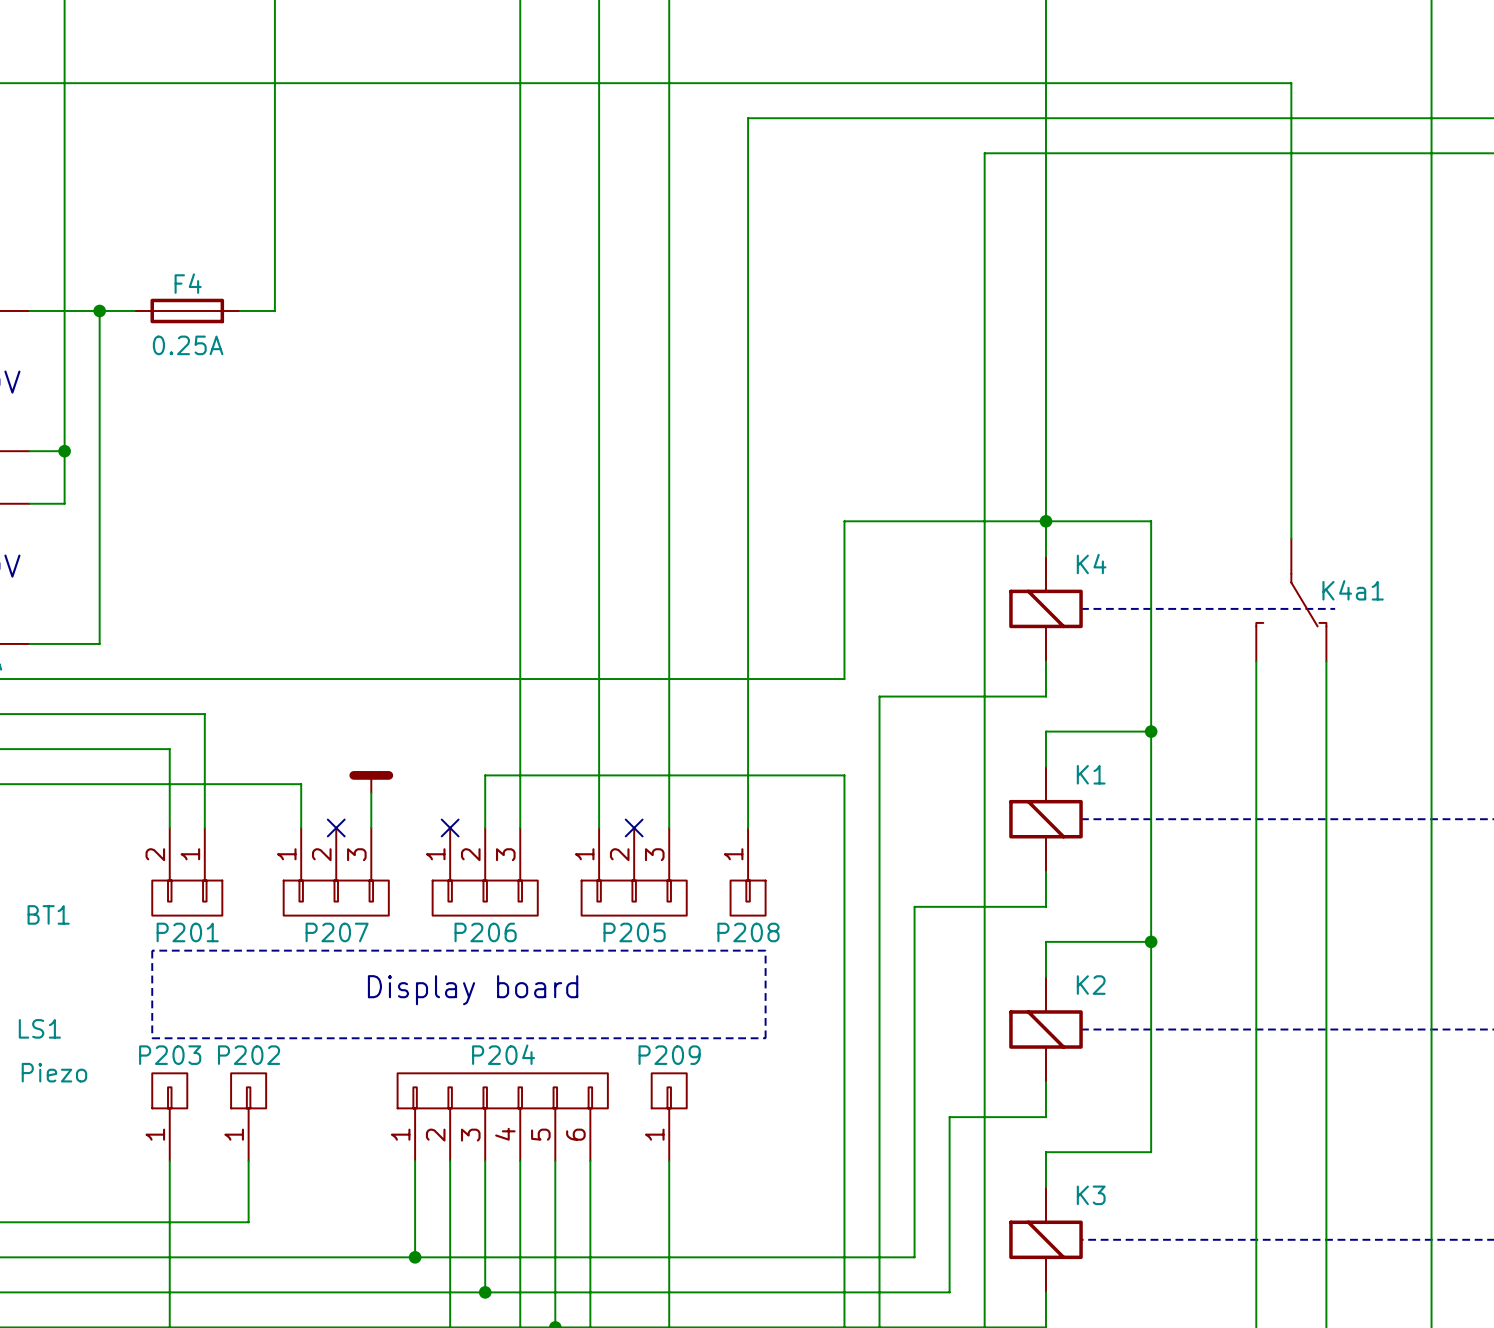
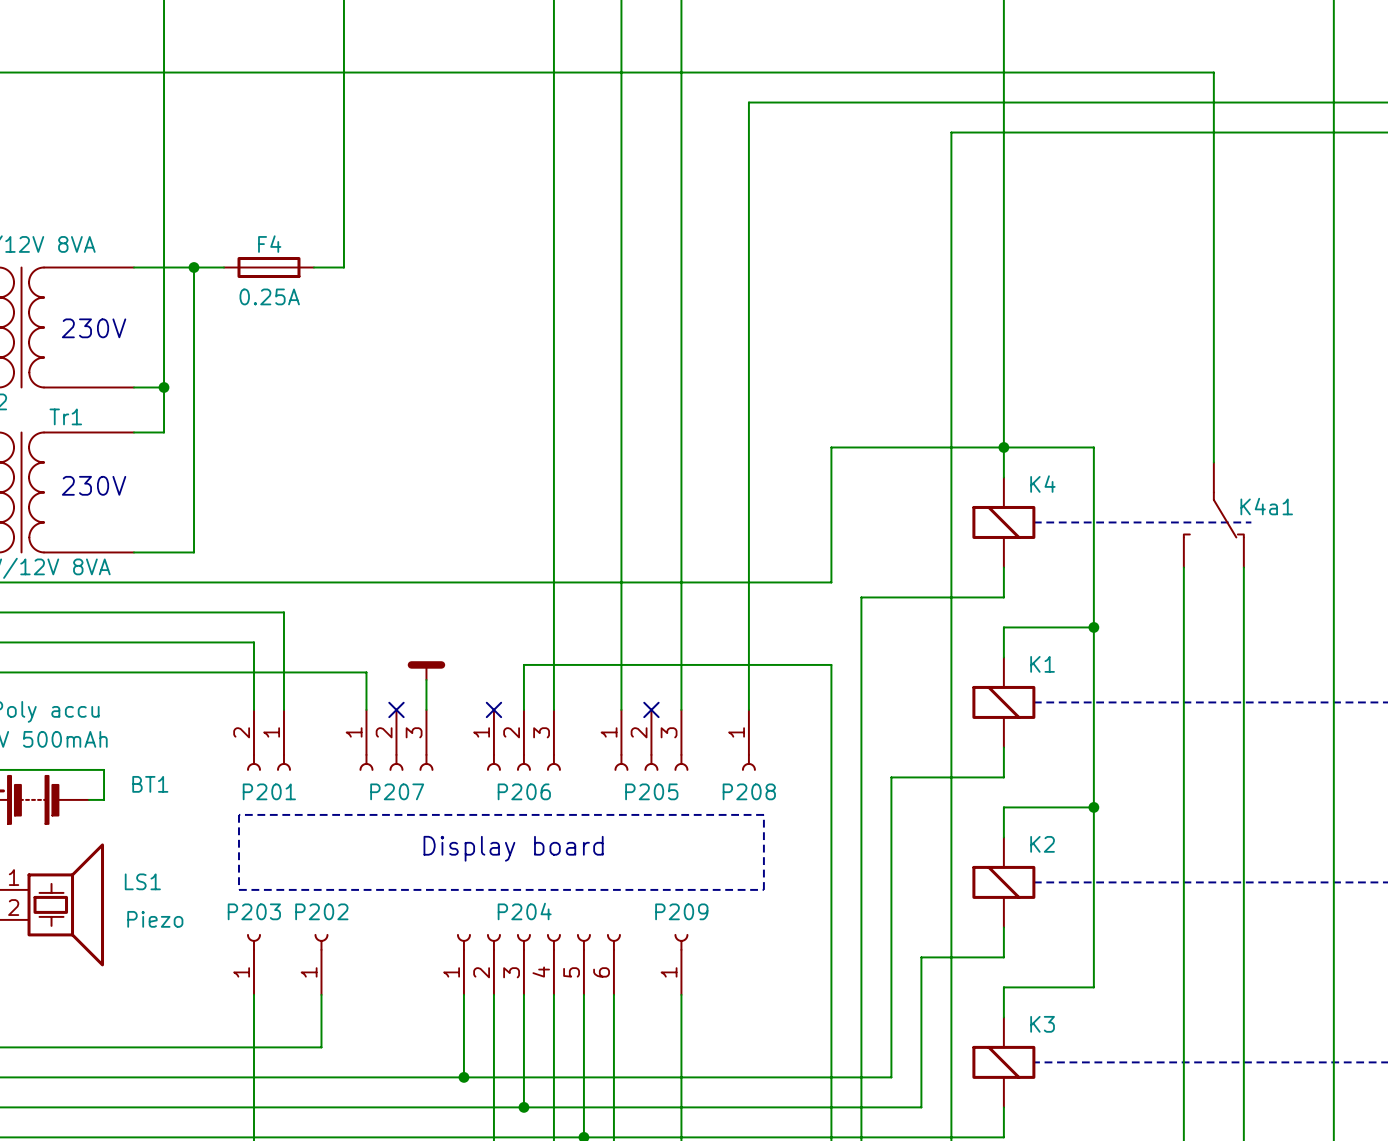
P201 symbol: [152, 827, 223, 916] -> [247, 709, 291, 771]
P207 symbol: [283, 827, 389, 916] -> [359, 709, 434, 771]
P206 symbol: [432, 827, 538, 916] -> [487, 709, 561, 771]
P205 symbol: [581, 827, 687, 916] -> [614, 709, 689, 771]
P208 symbol: [730, 827, 766, 916] -> [742, 709, 756, 771]
P203 symbol: [152, 1073, 188, 1161] -> [247, 934, 261, 995]
P202 symbol: [231, 1073, 267, 1161] -> [314, 934, 329, 995]
P204 symbol: [397, 1073, 608, 1161] -> [457, 934, 621, 995]
P209 symbol: [651, 1073, 687, 1161] -> [674, 934, 689, 995]

